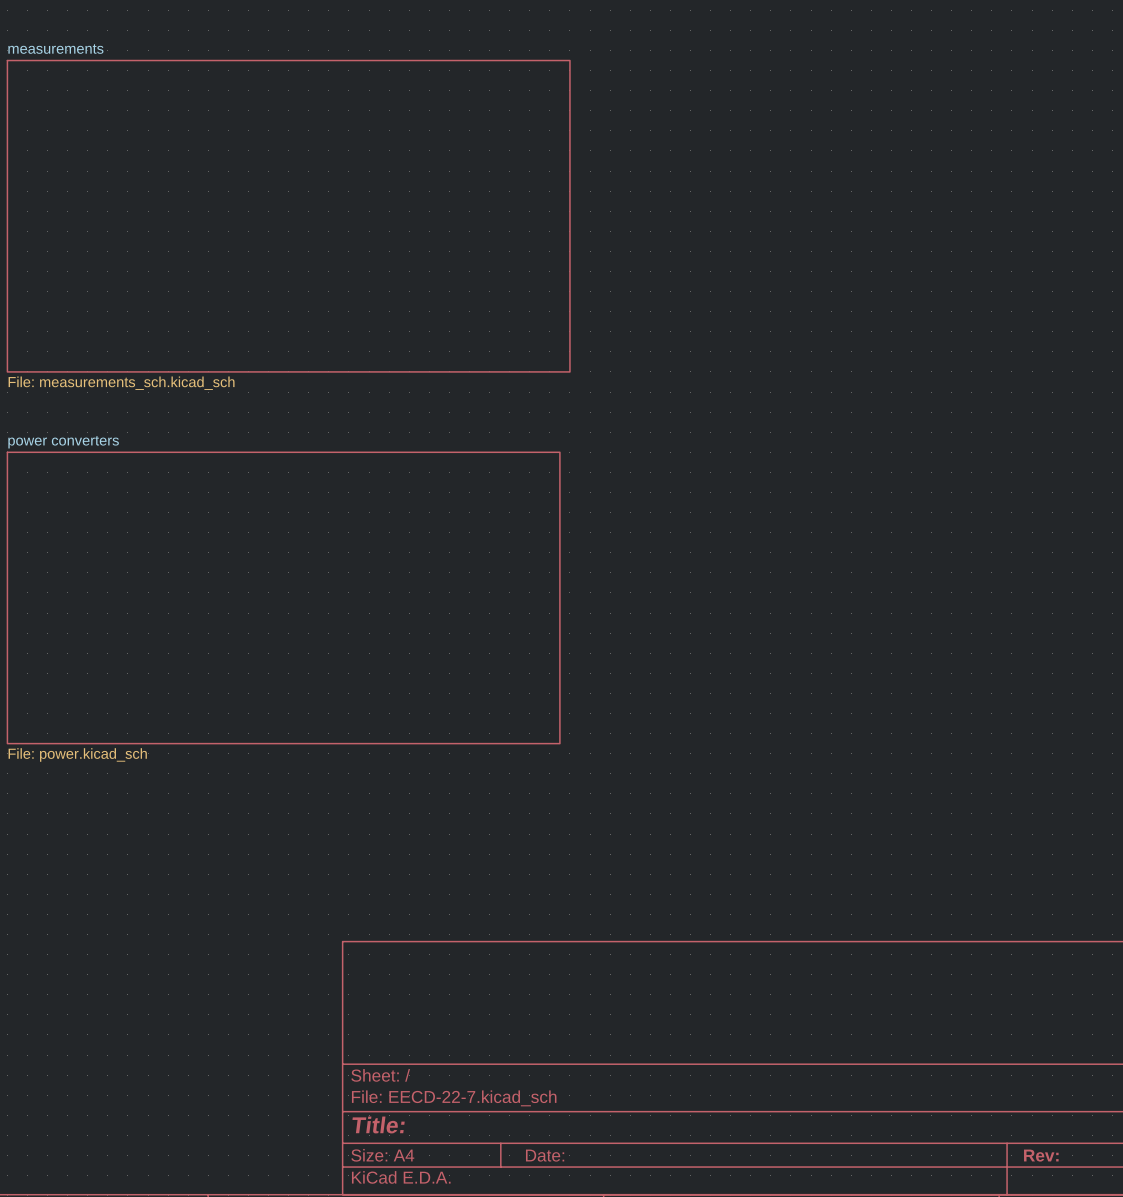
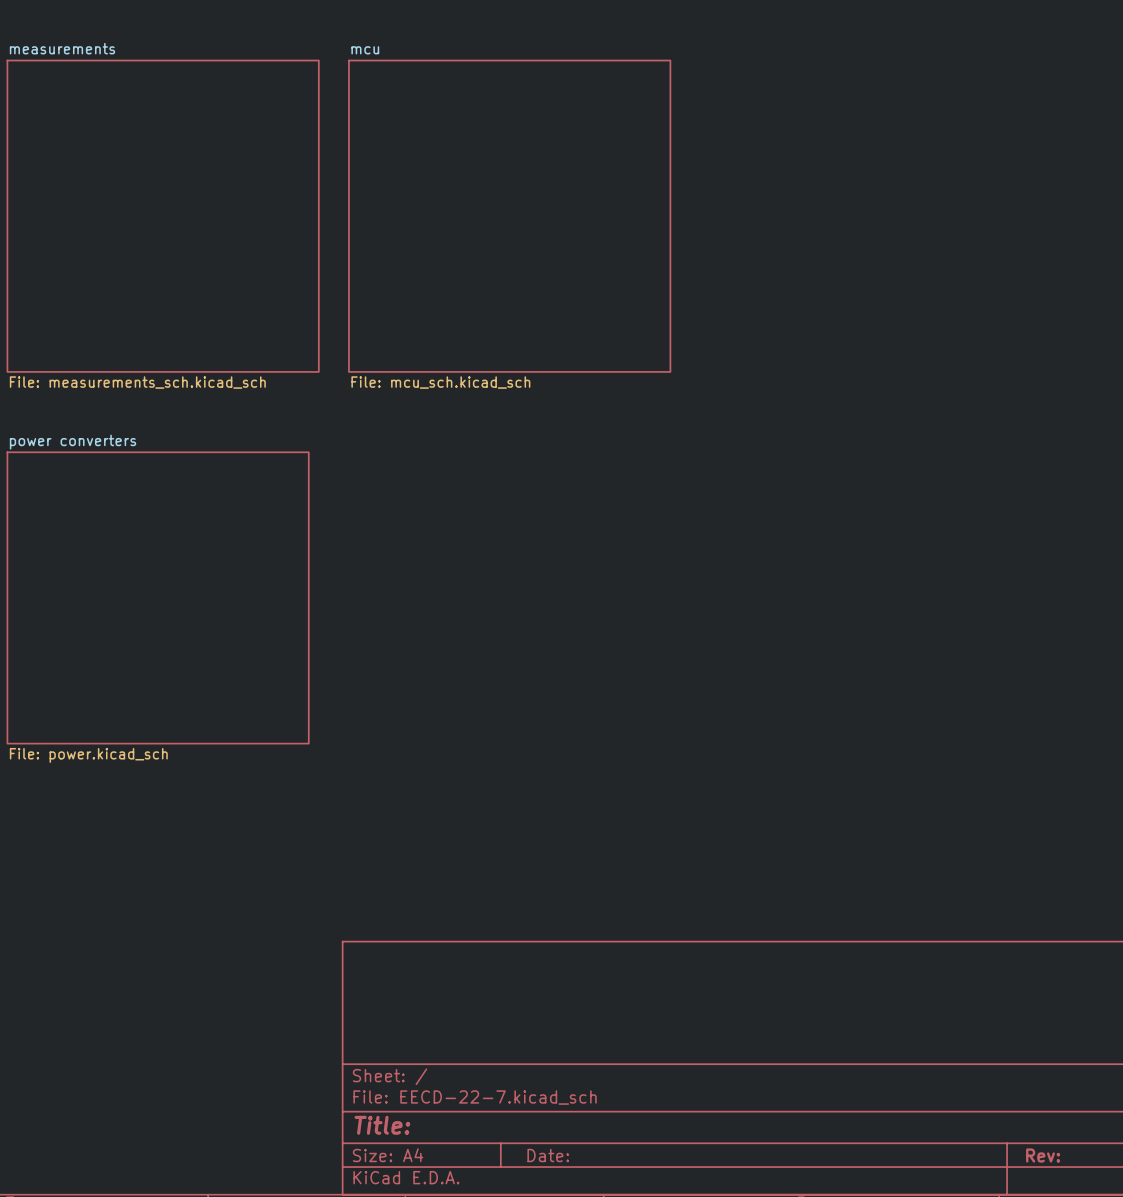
sheet measurements: none -> File: measurements_sch.kicad_sch (163, 216)
sheet measurements: File: measurements_sch.kicad_sch (288, 216) -> none
sheet mcu: none -> File: mcu_sch.kicad_sch (509, 216)
sheet power converters: none -> File: power.kicad_sch (158, 597)
sheet power converters: File: power.kicad_sch (283, 597) -> none

